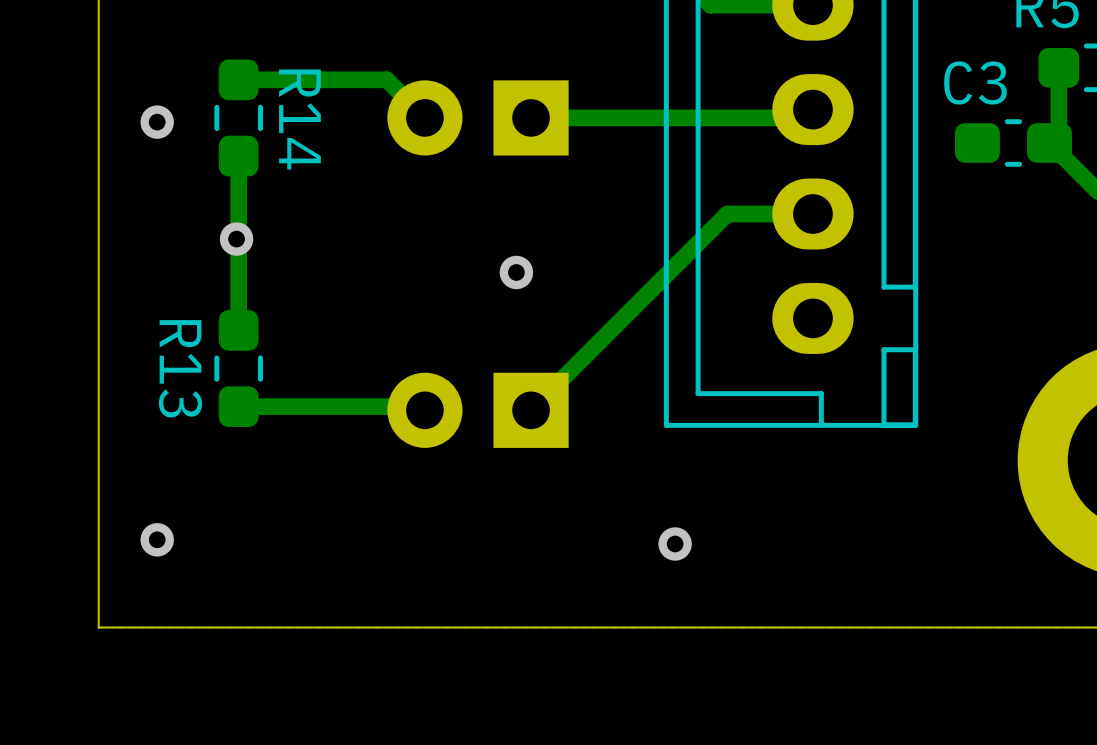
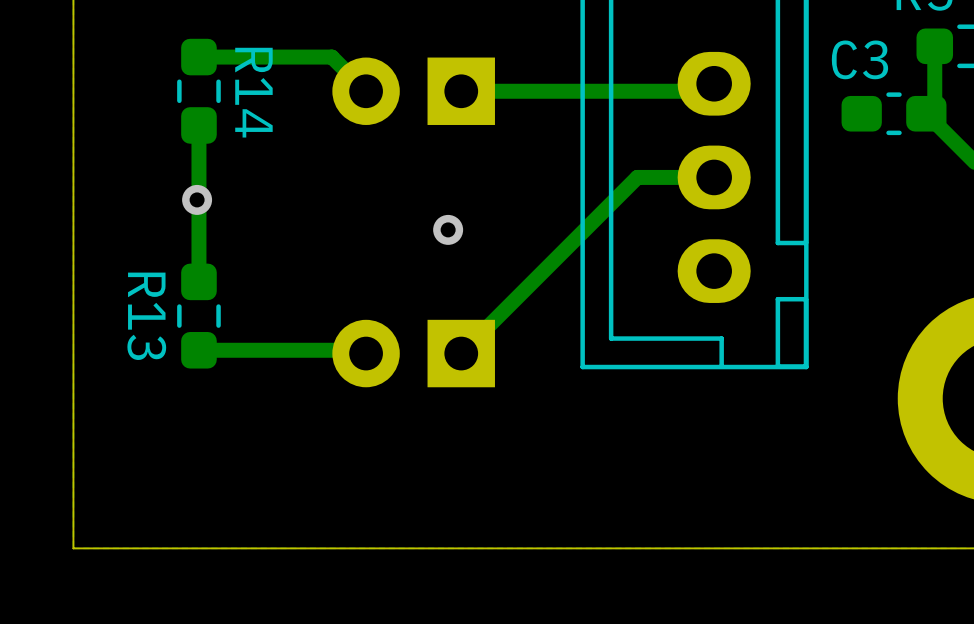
via: (157, 122) -> none
via: (157, 539) -> none
via: (675, 543) -> none

